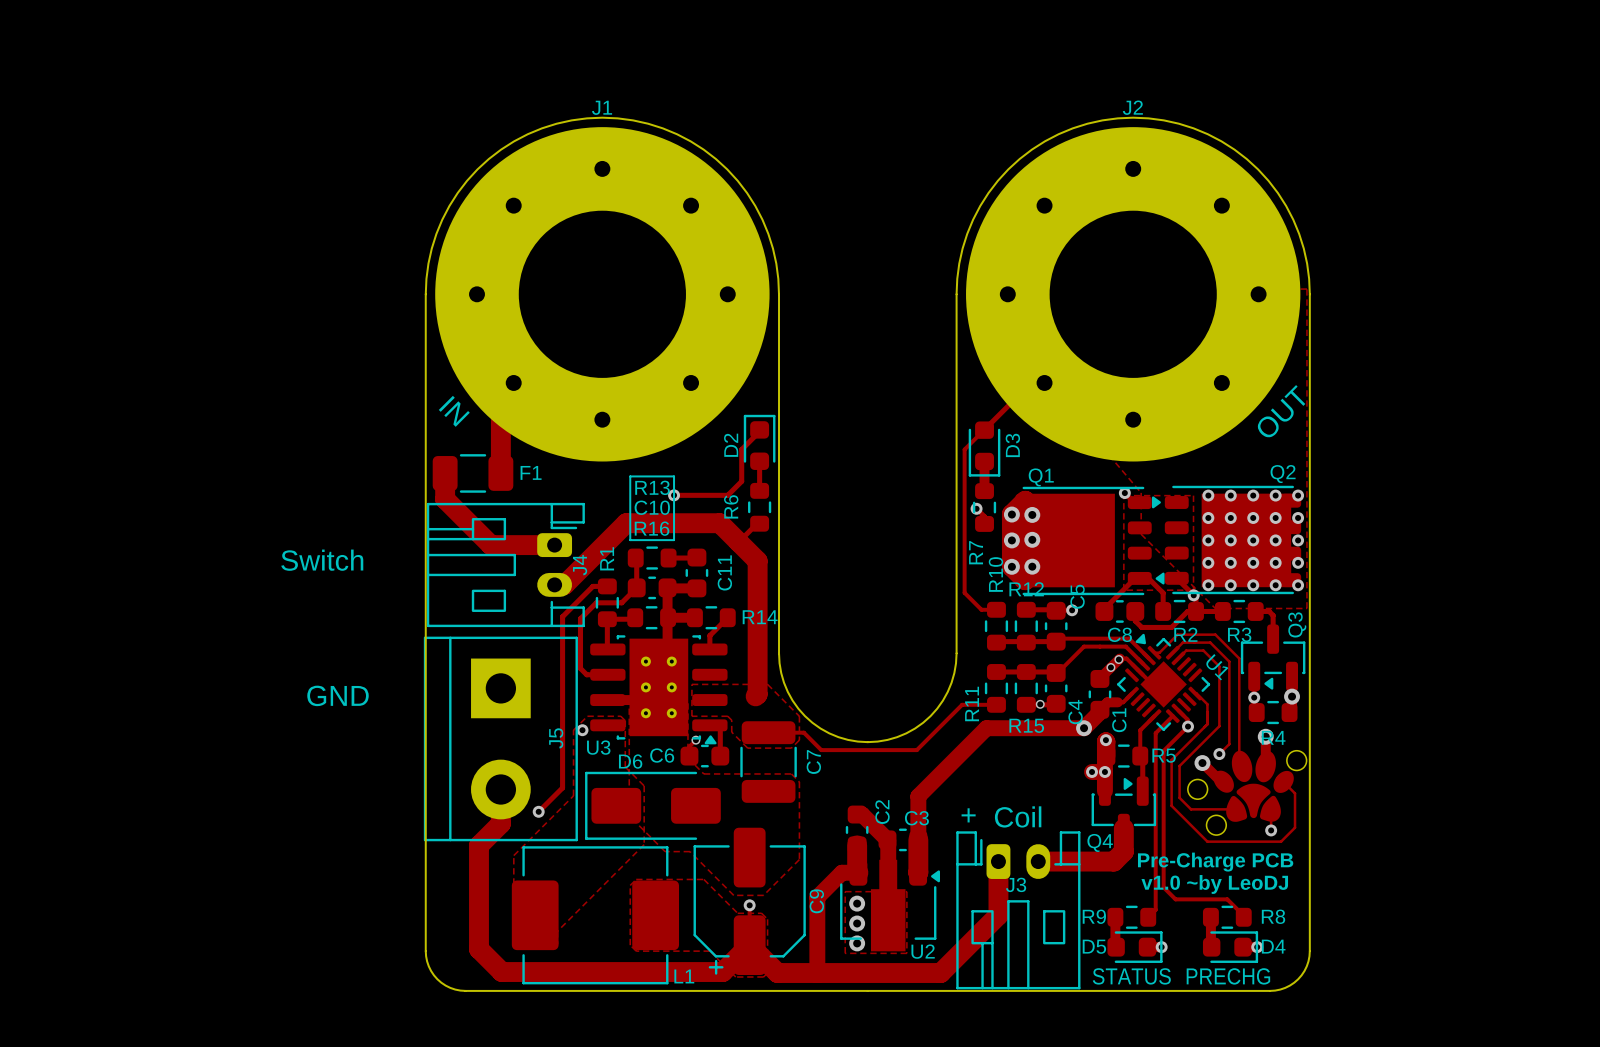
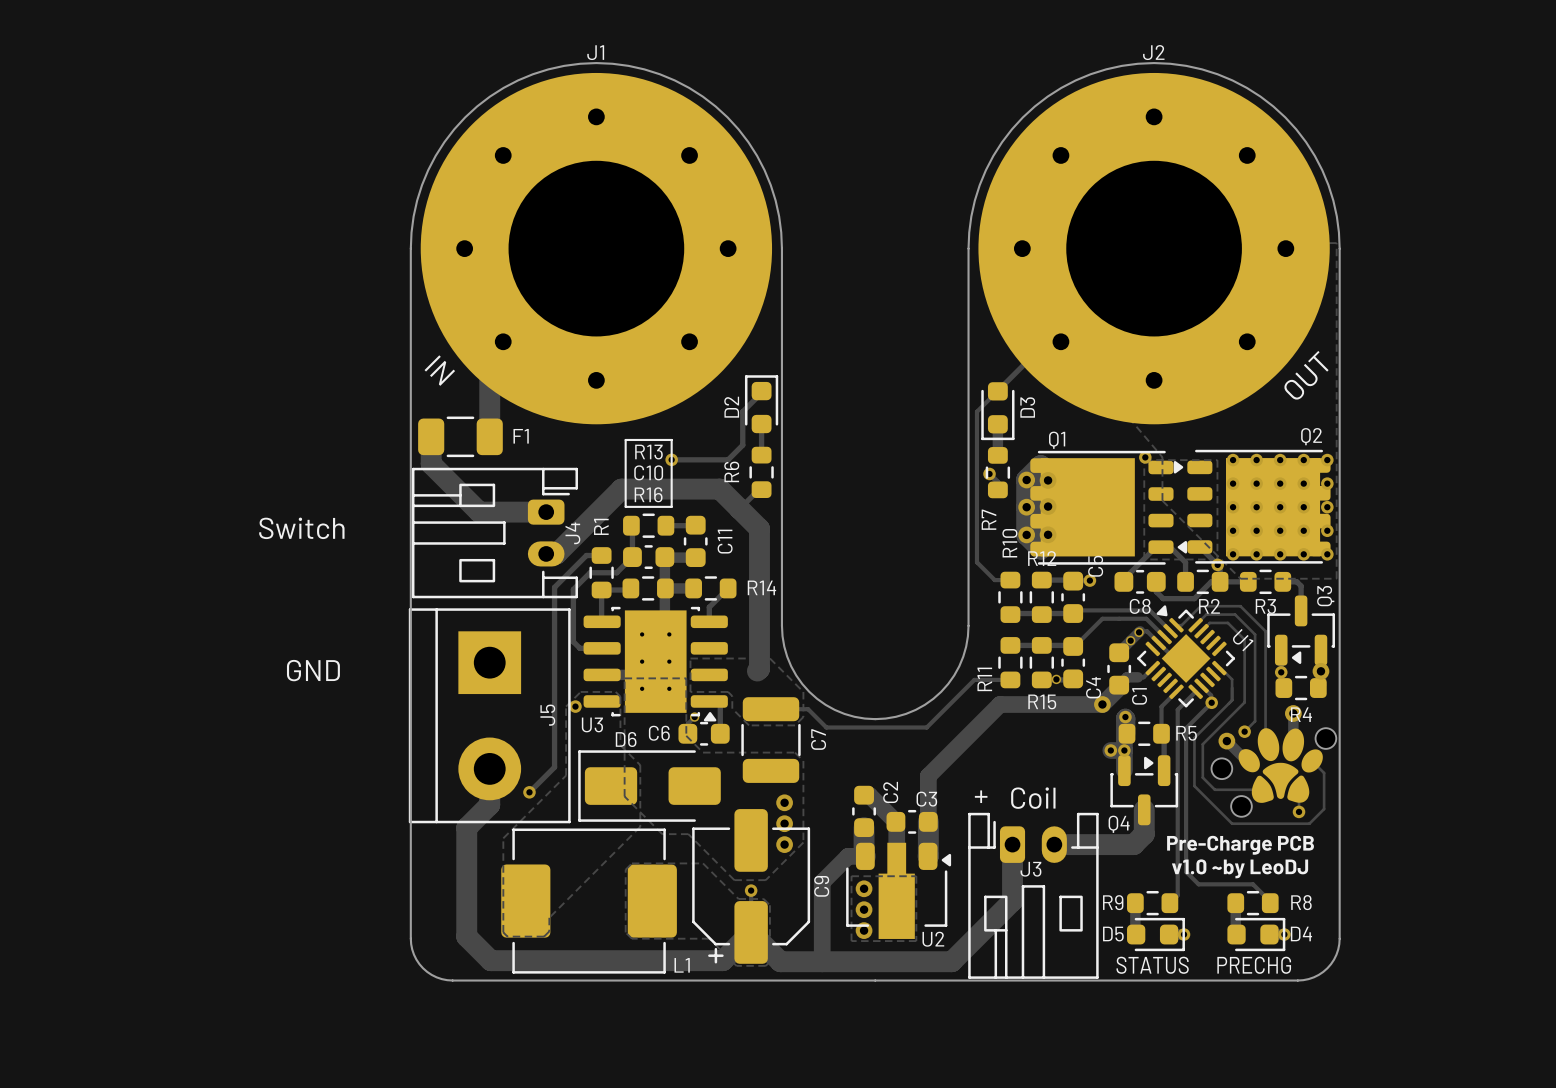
via: none -> (784, 802)
via: none -> (784, 823)
via: none -> (784, 844)

